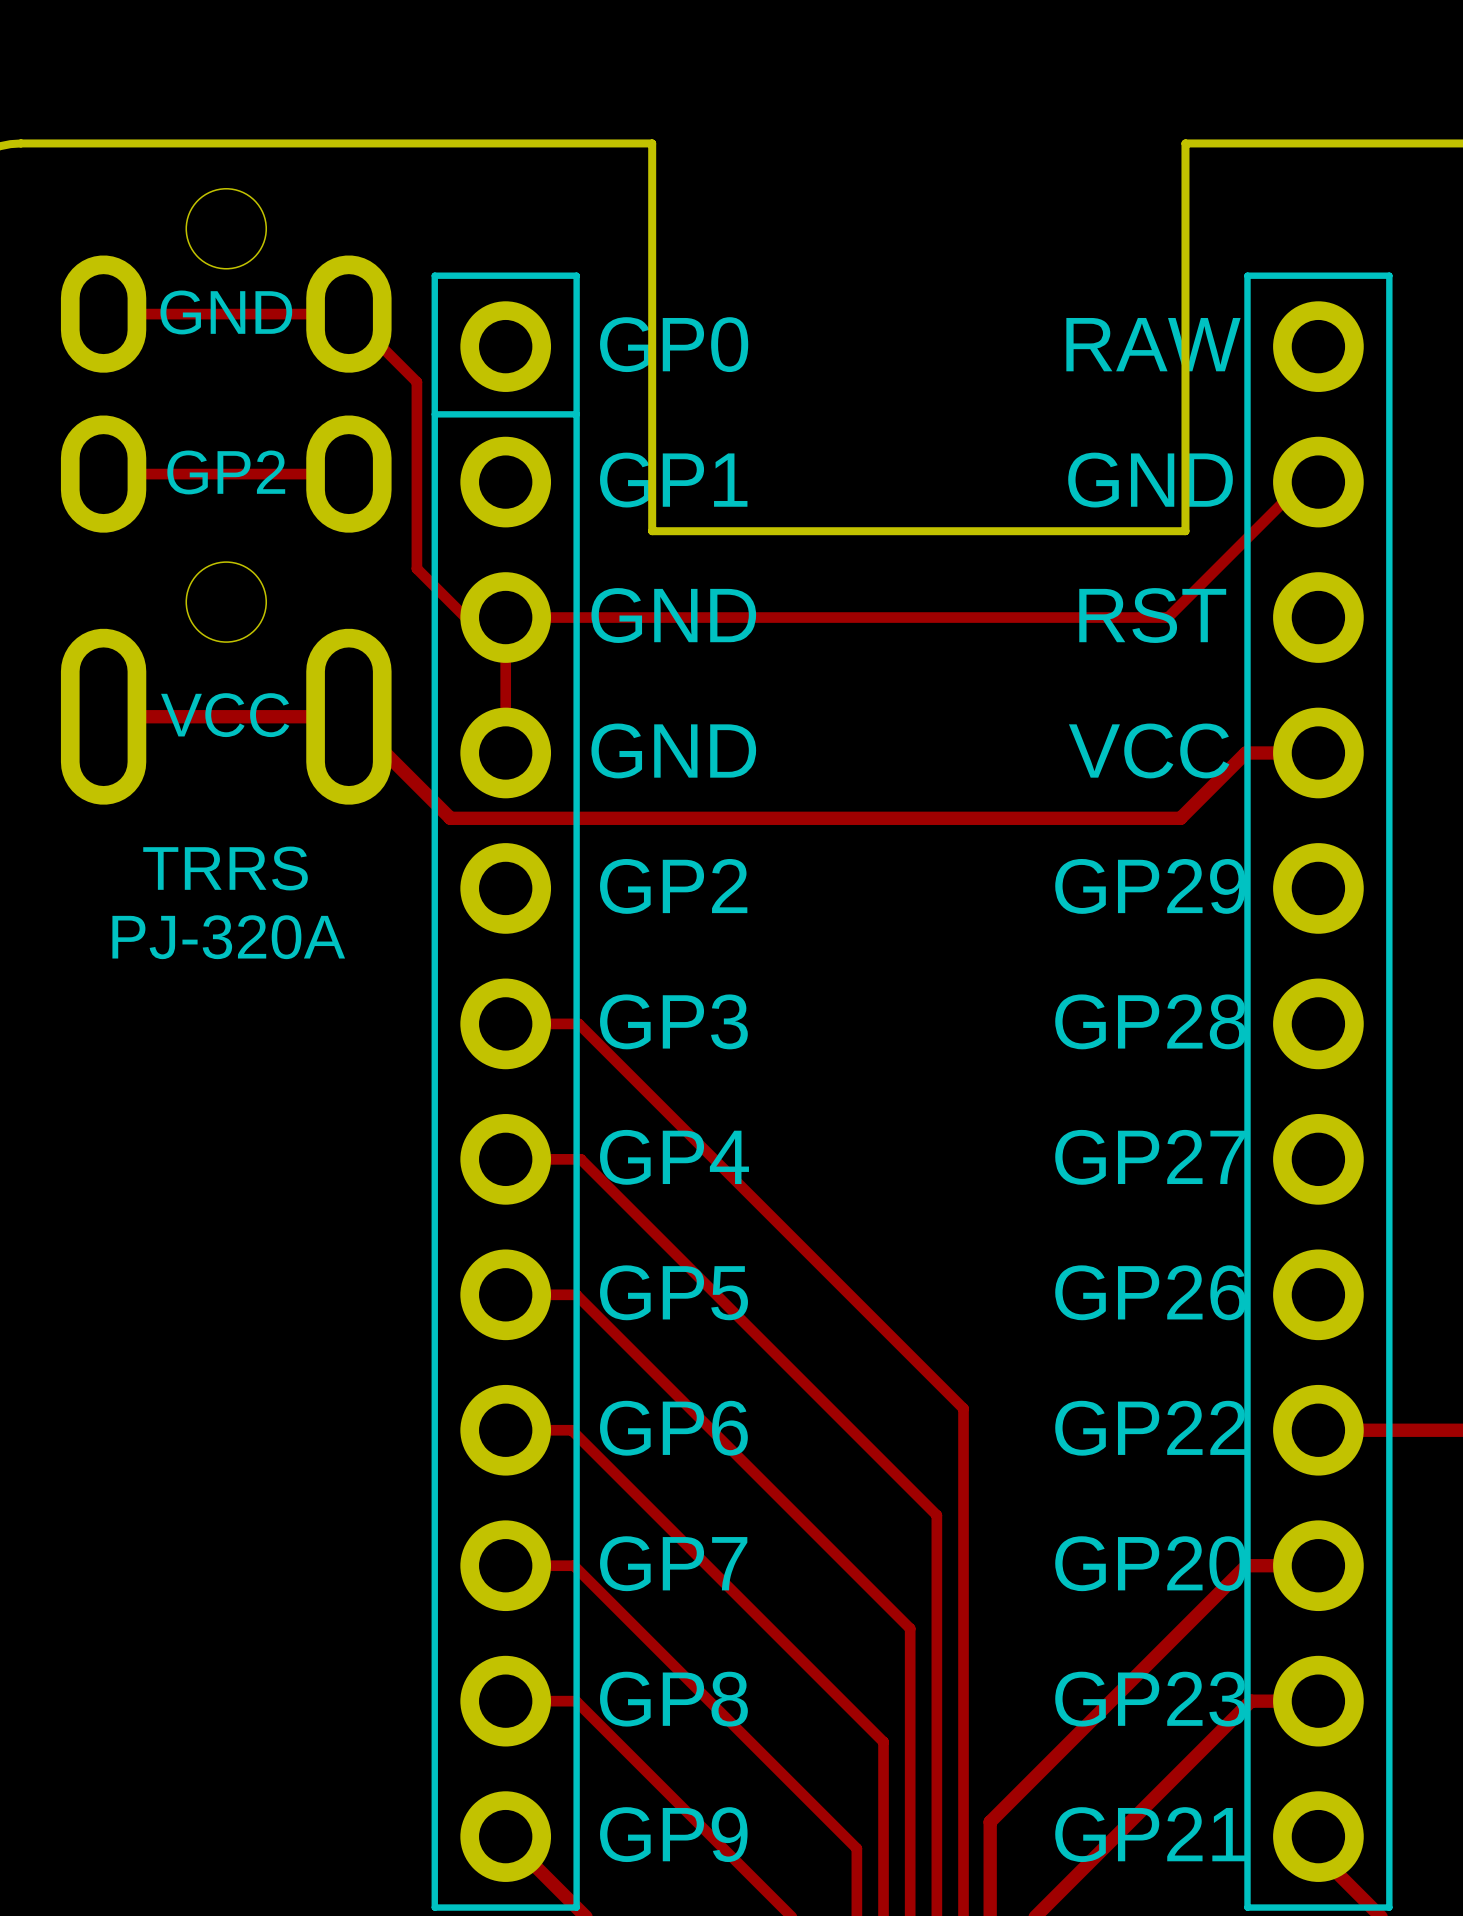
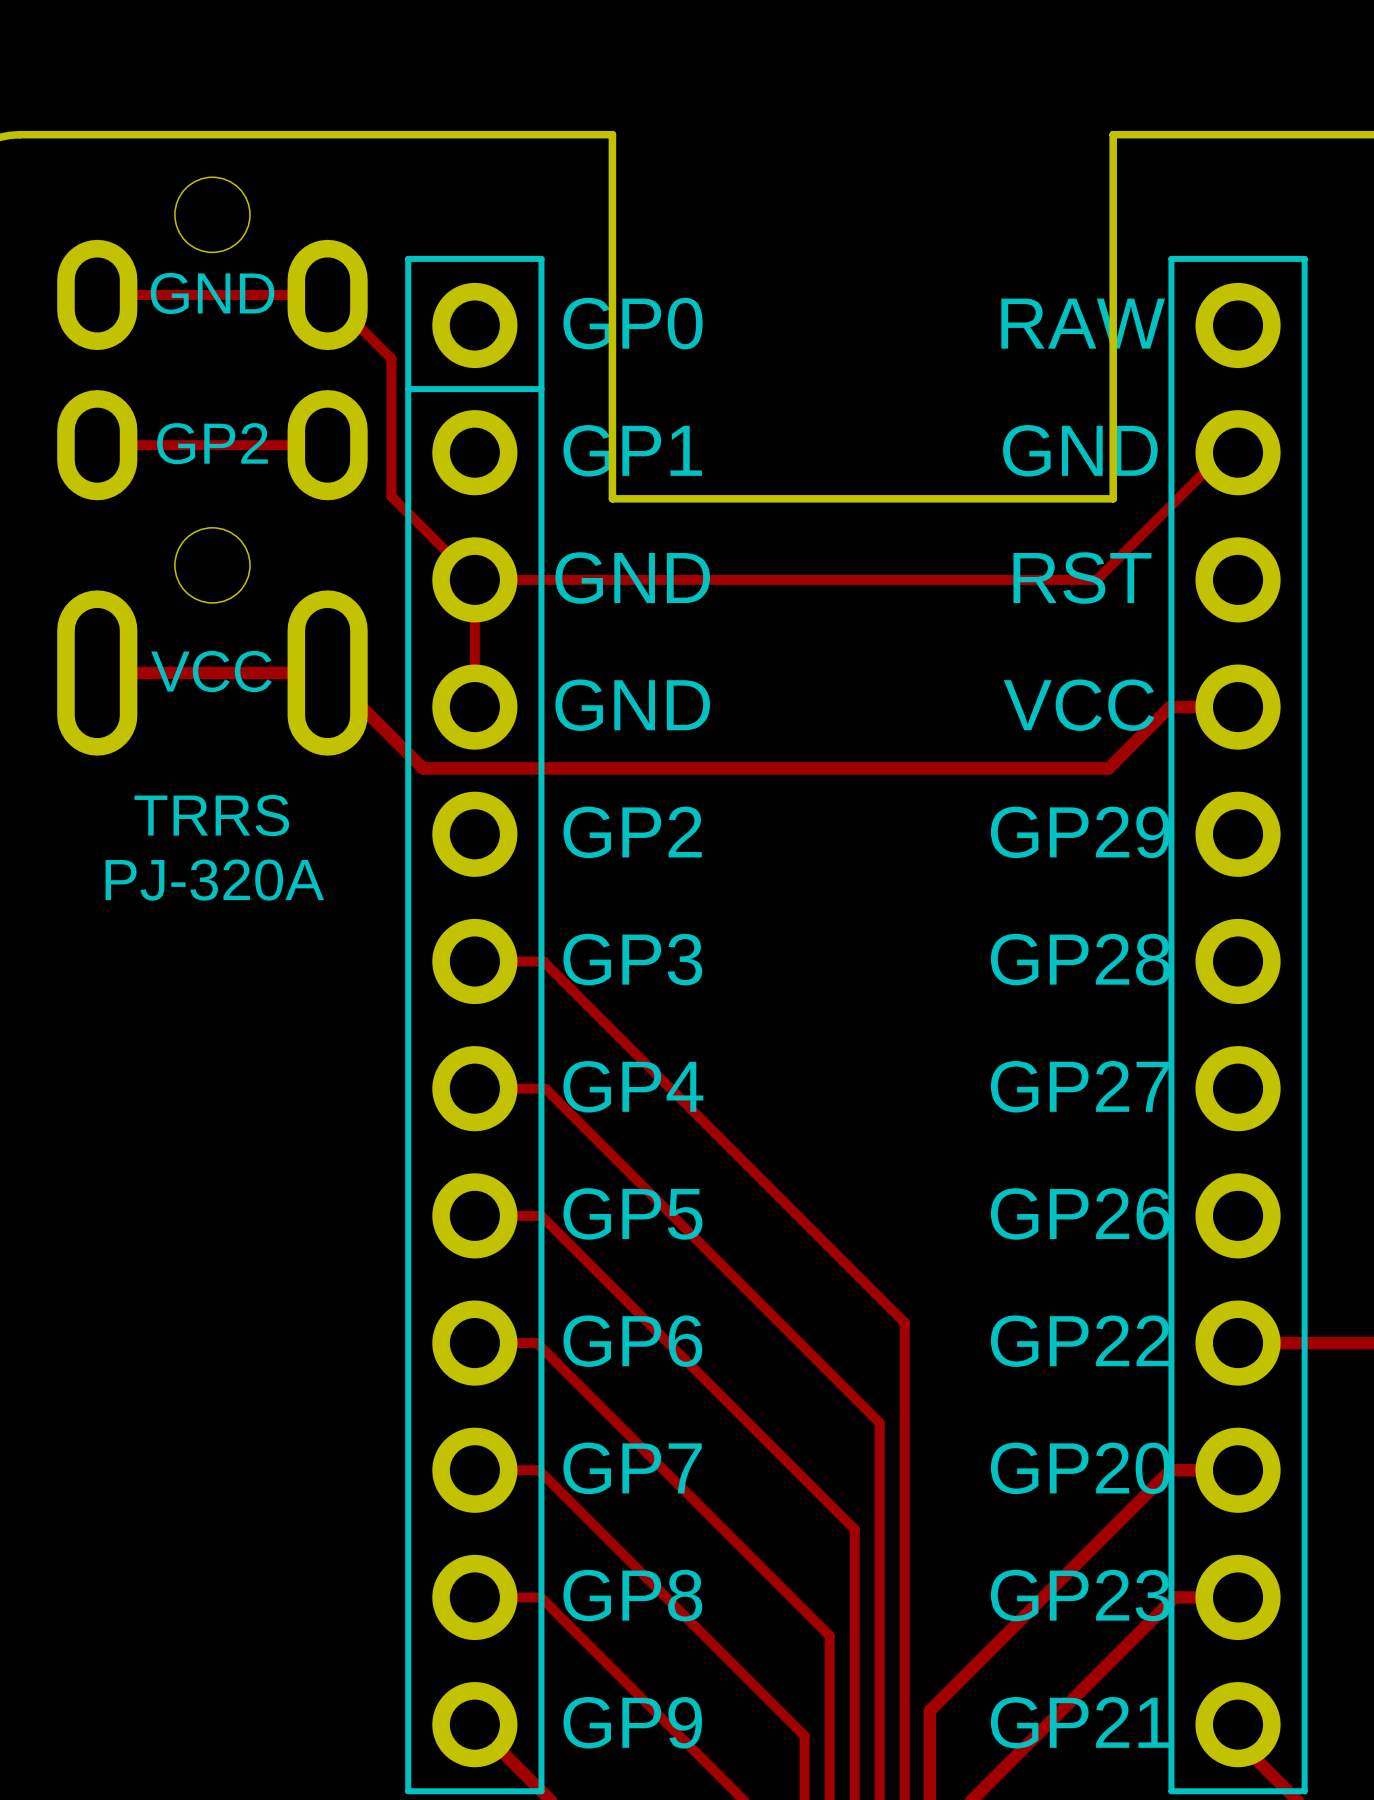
track: (416, 528) (416, 568) (465, 617) -> (391, 496) (474, 579)

